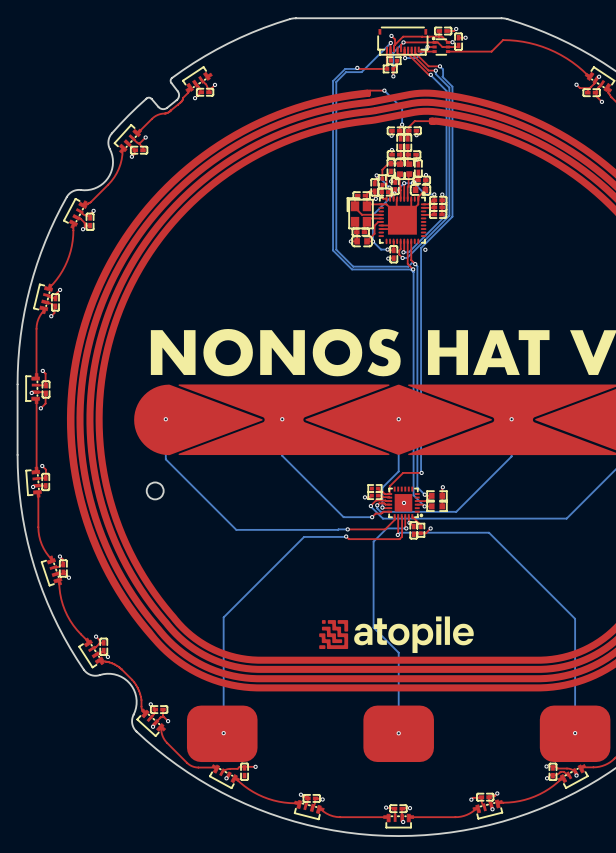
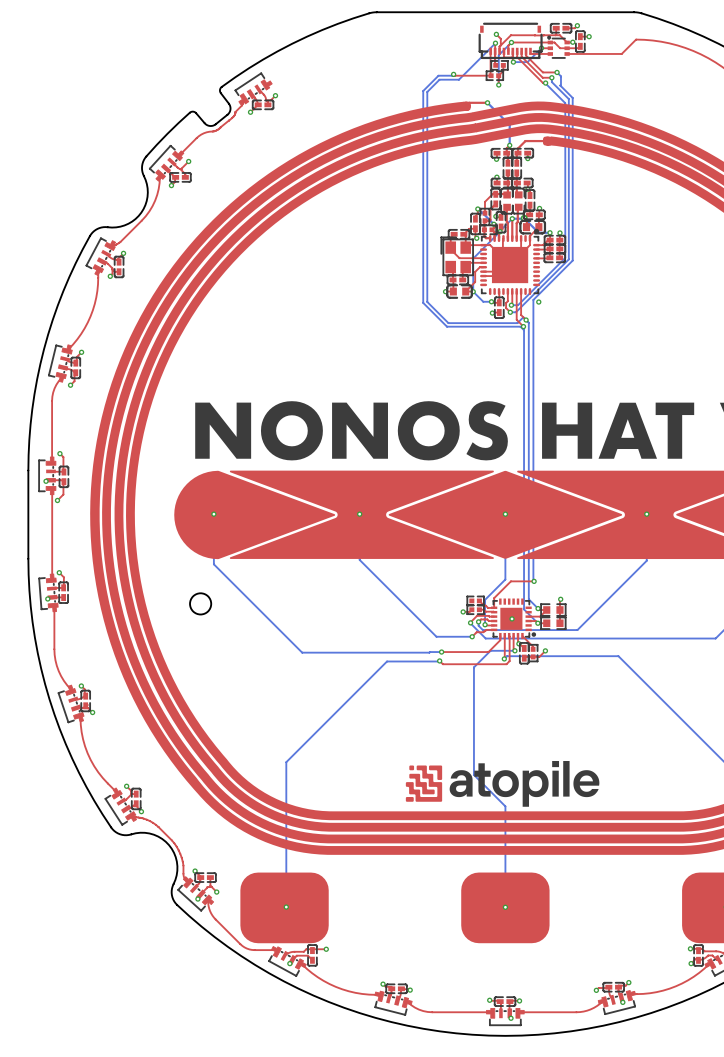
top track: none -> (292, 960) (296, 955) (307, 955) (312, 960)

